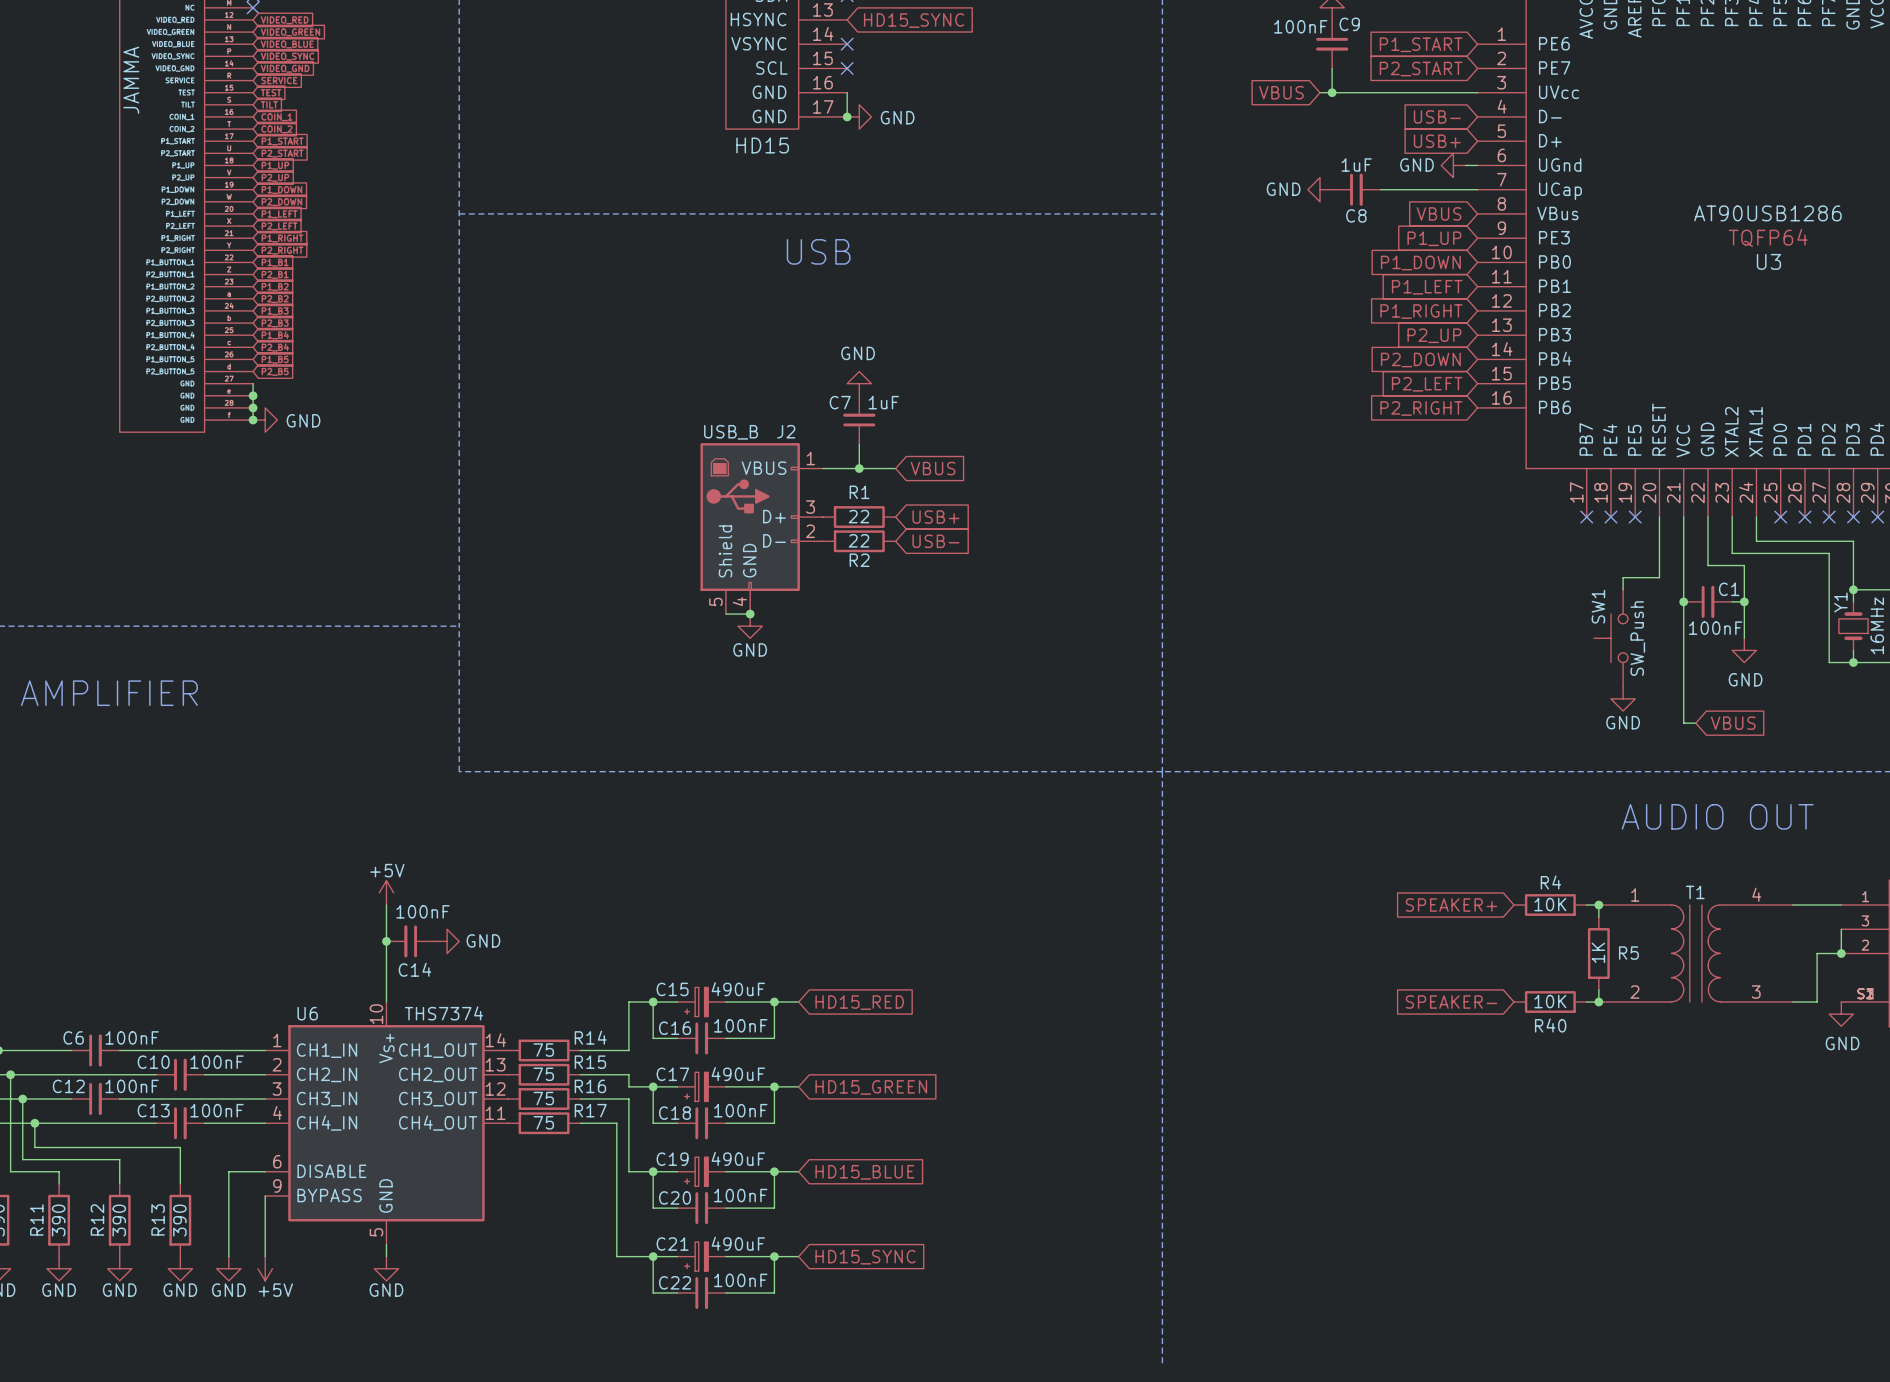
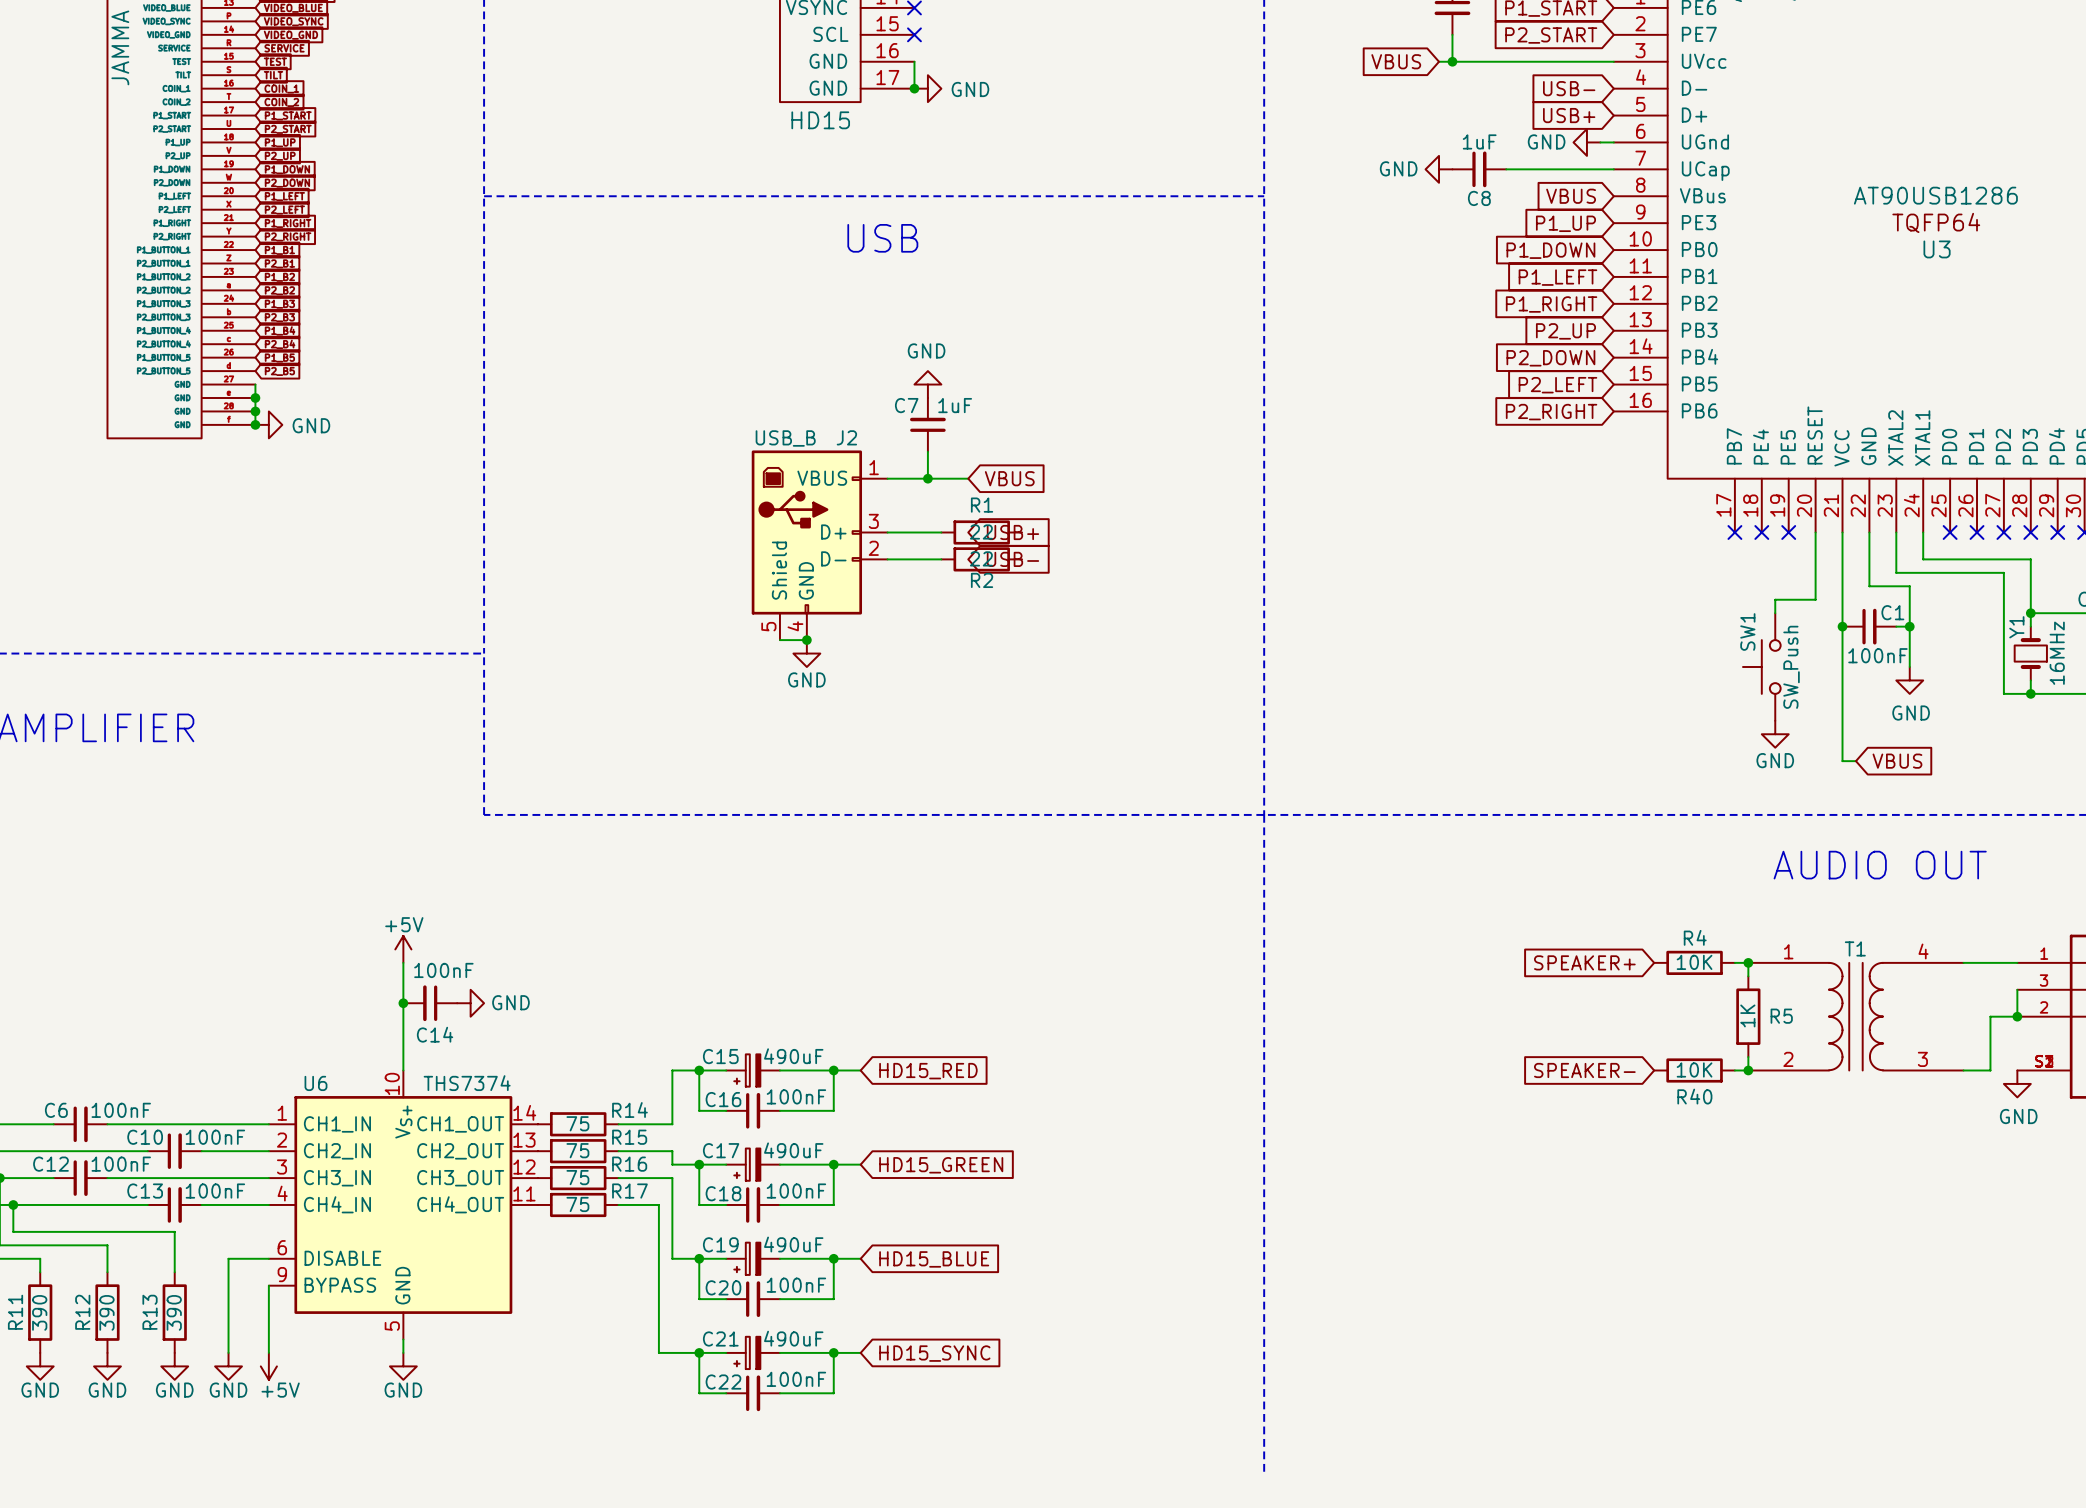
wire: none -> (887, 532) (941, 532)
R1 position: (859, 517) -> (981, 532)
wire: none -> (887, 559) (941, 559)
R2 position: (859, 541) -> (981, 559)

